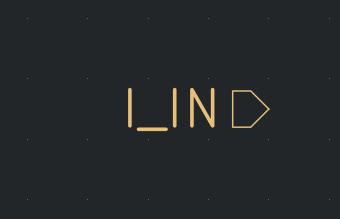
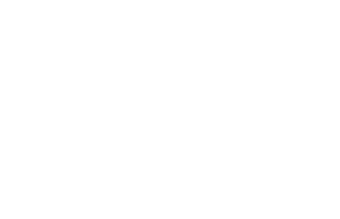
hierarchical label: I_IN (171, 109) -> none

